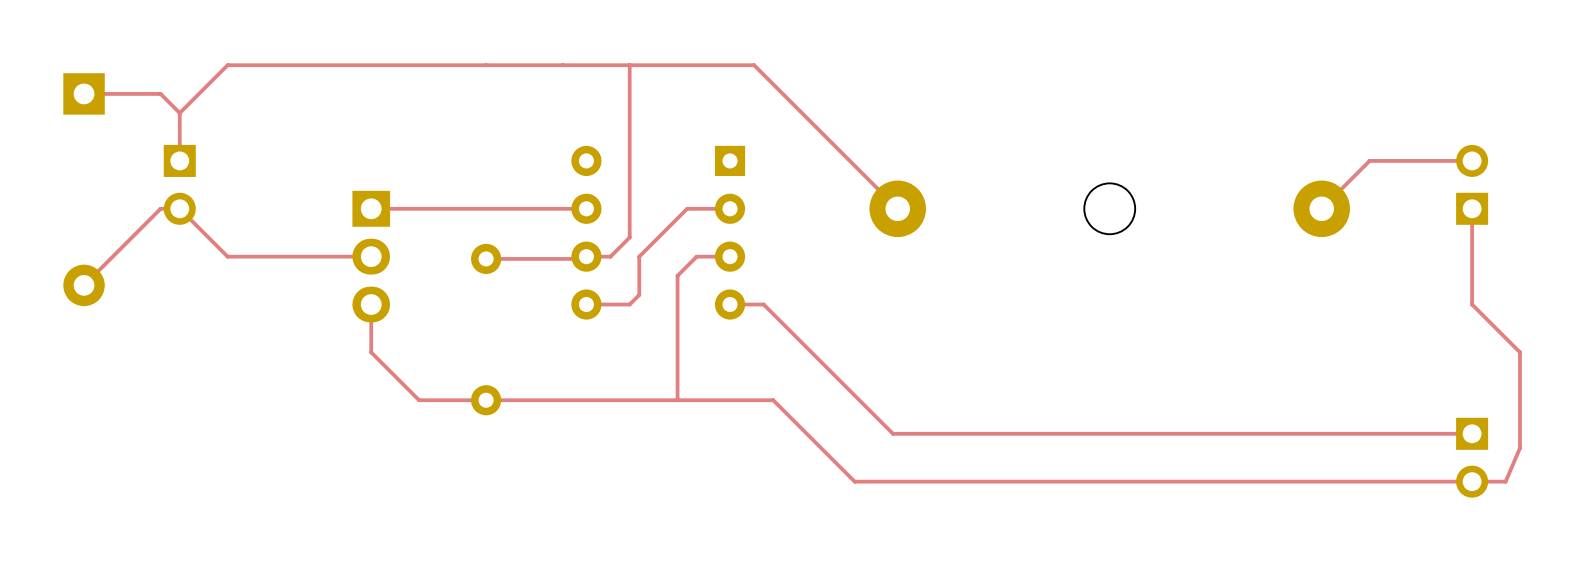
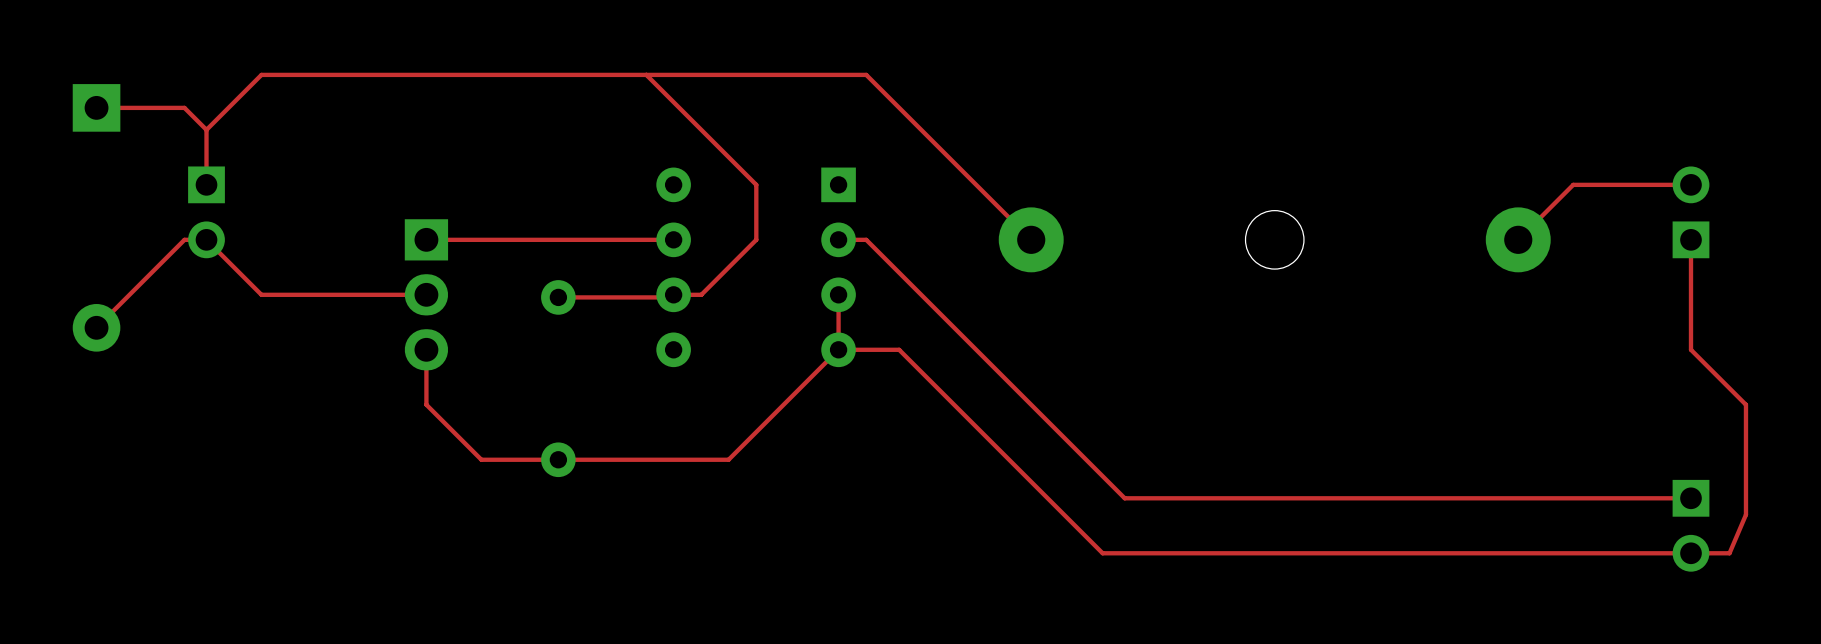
top track: (629, 65) (629, 237) -> (646, 74) (756, 184) (756, 239) (723, 272)
top track: (730, 208) (687, 208) (639, 256) (639, 294) (629, 304) (586, 304) -> (838, 239) (866, 239) (1124, 498)
top track: (730, 256) (696, 256) (677, 275) (677, 400) -> (838, 294) (838, 349) (728, 459)
top track: (763, 304) (892, 433) (979, 433) -> (877, 349) (899, 349) (1102, 553)
top track: (634, 400) (773, 400) (854, 481) (959, 481) -> none

